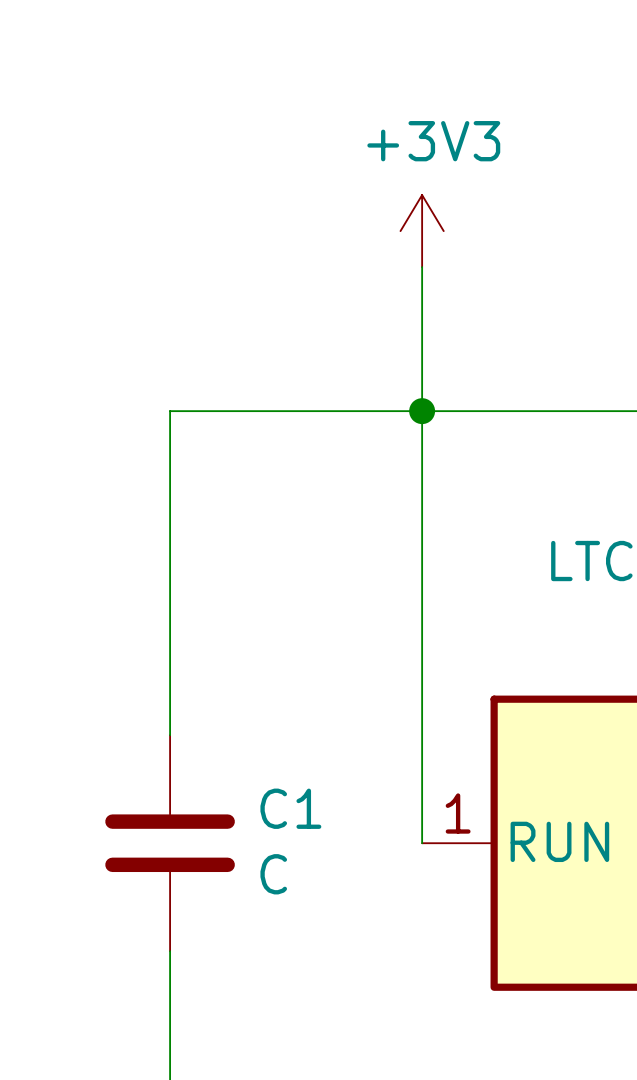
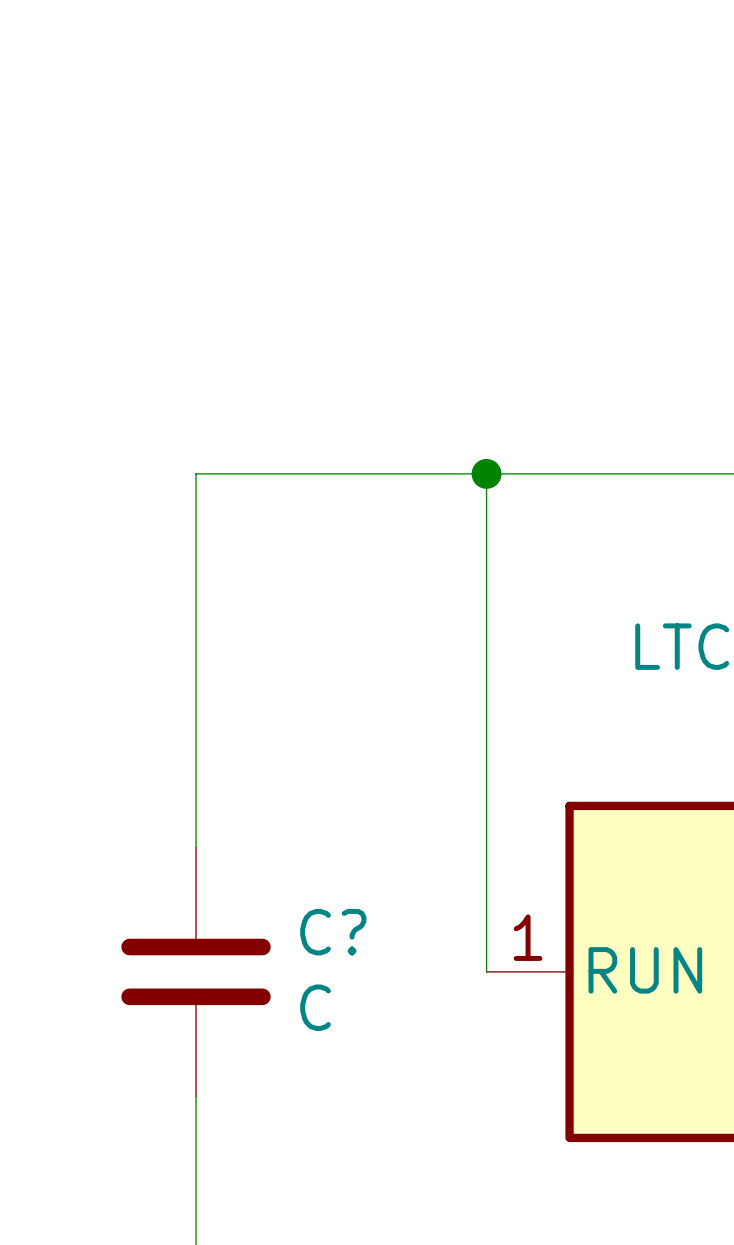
power symbol: +3V3 (422, 231) -> none
wire: (422, 267) (422, 411) -> none
C1 name: C1 (290, 808) -> C? (333, 932)

